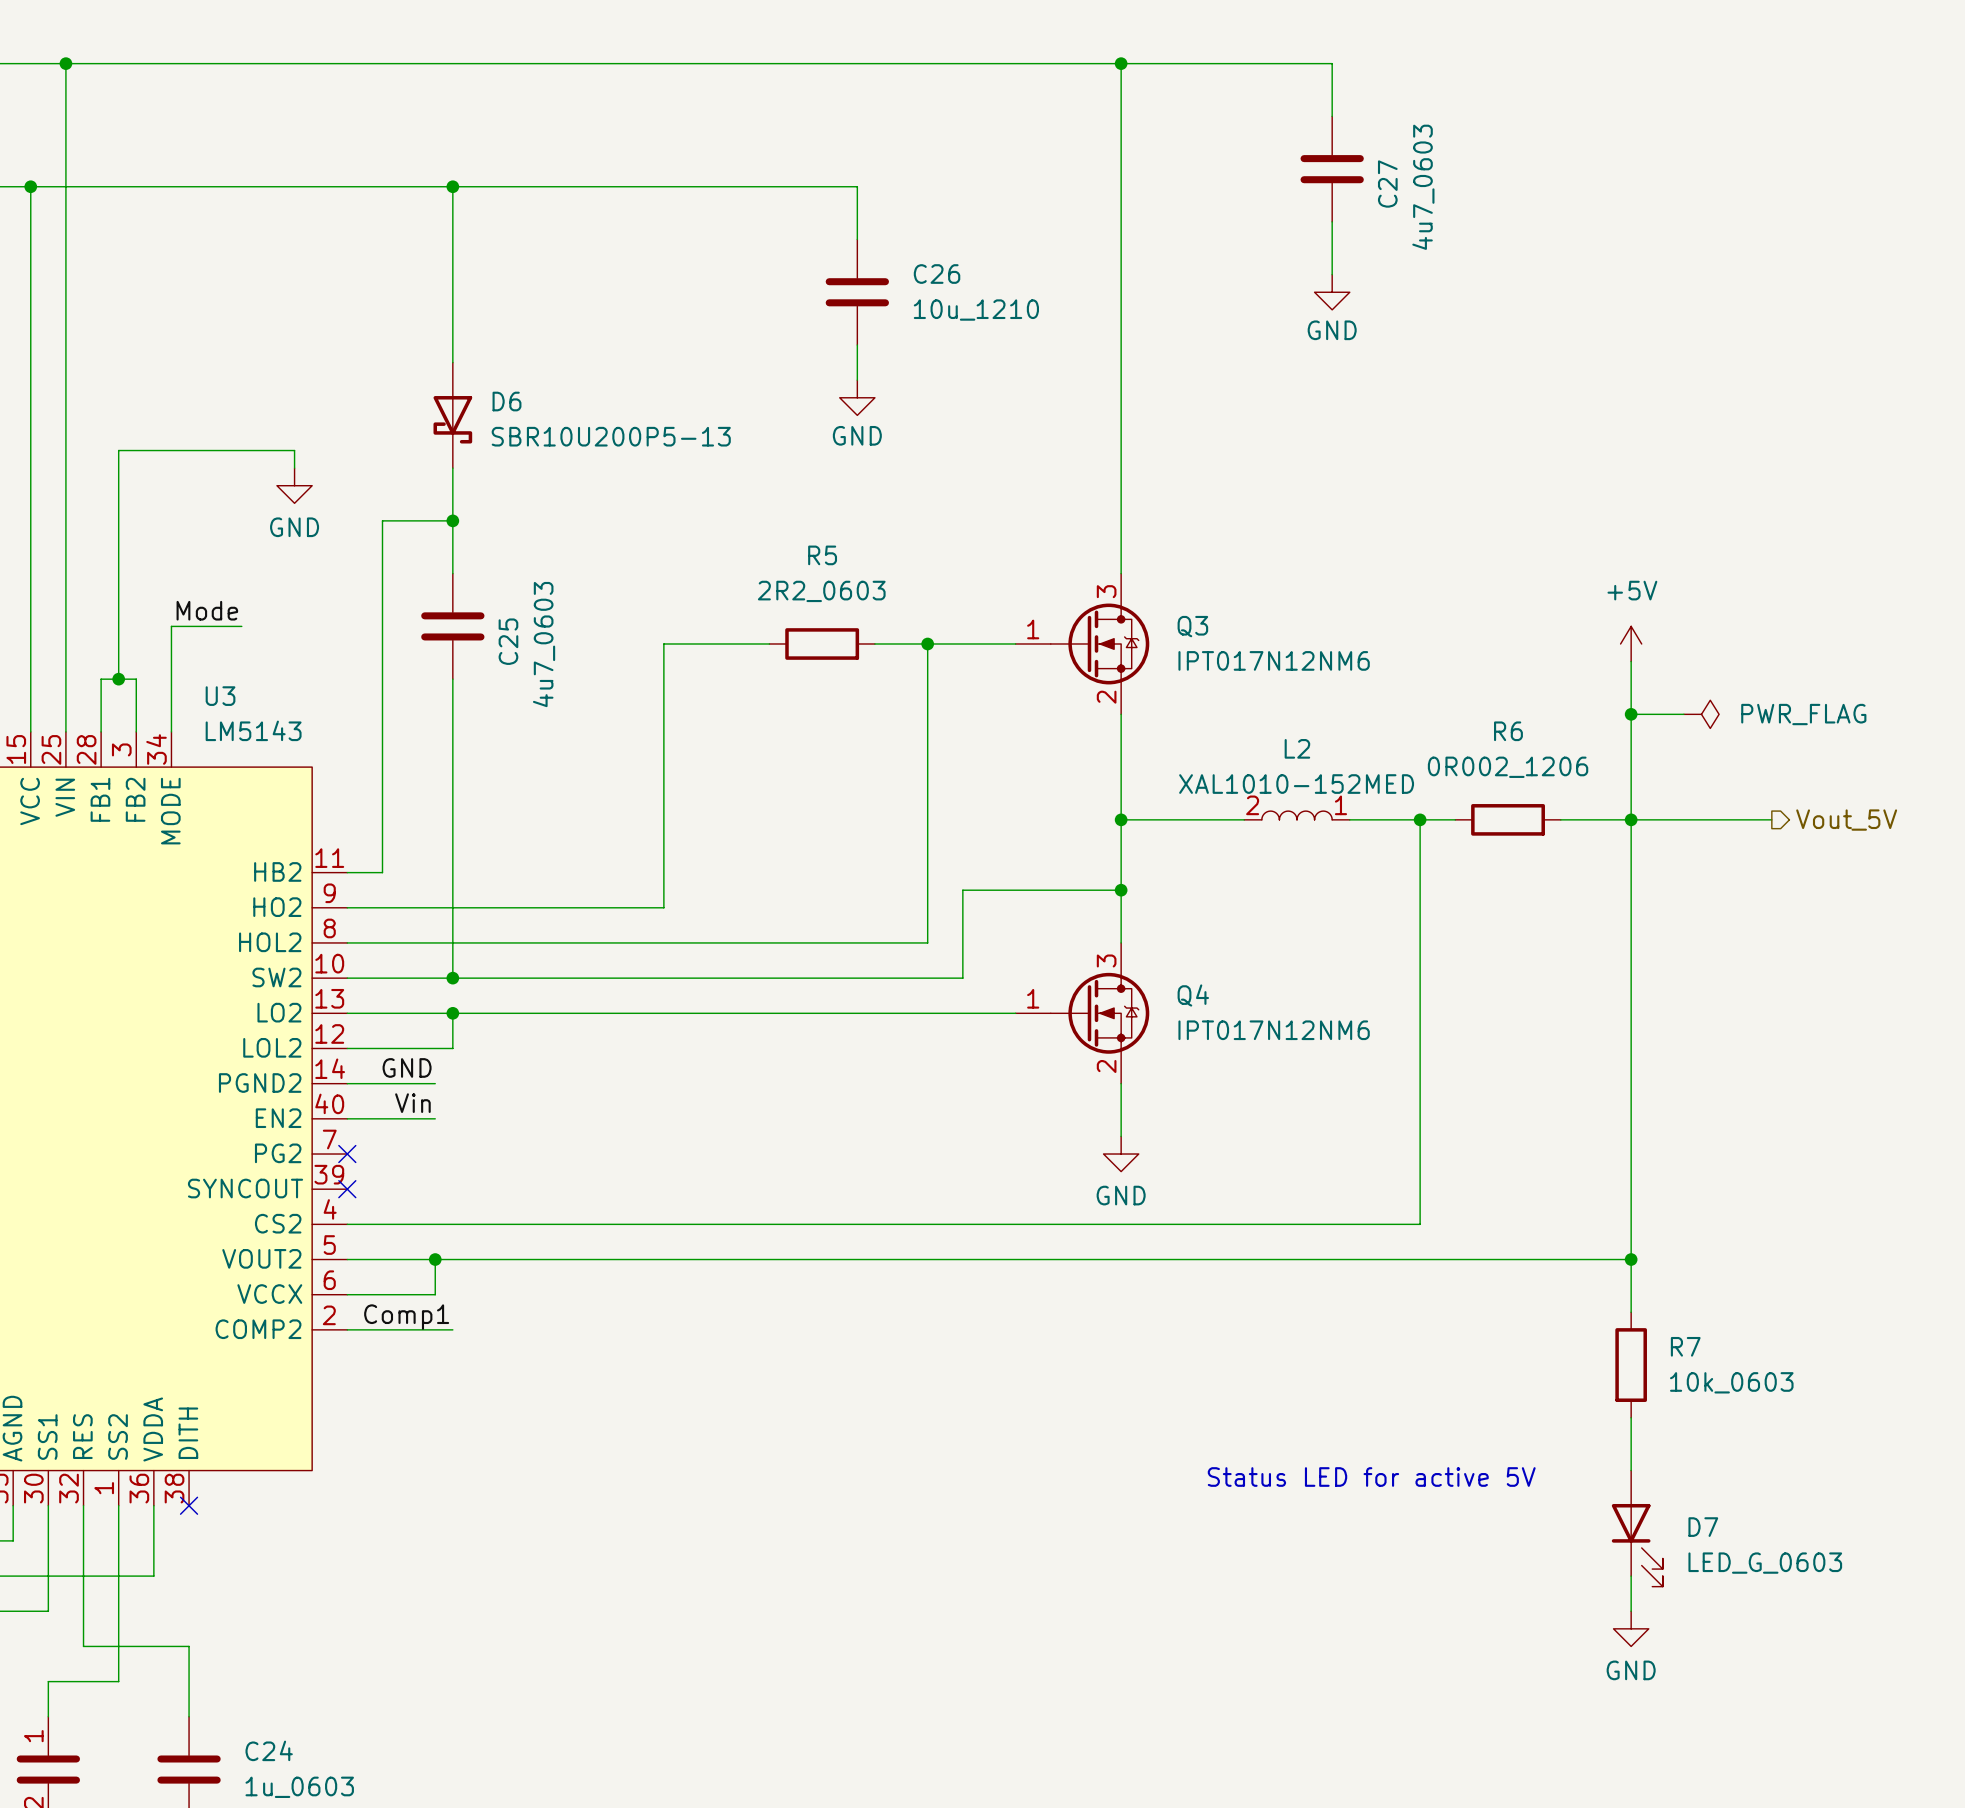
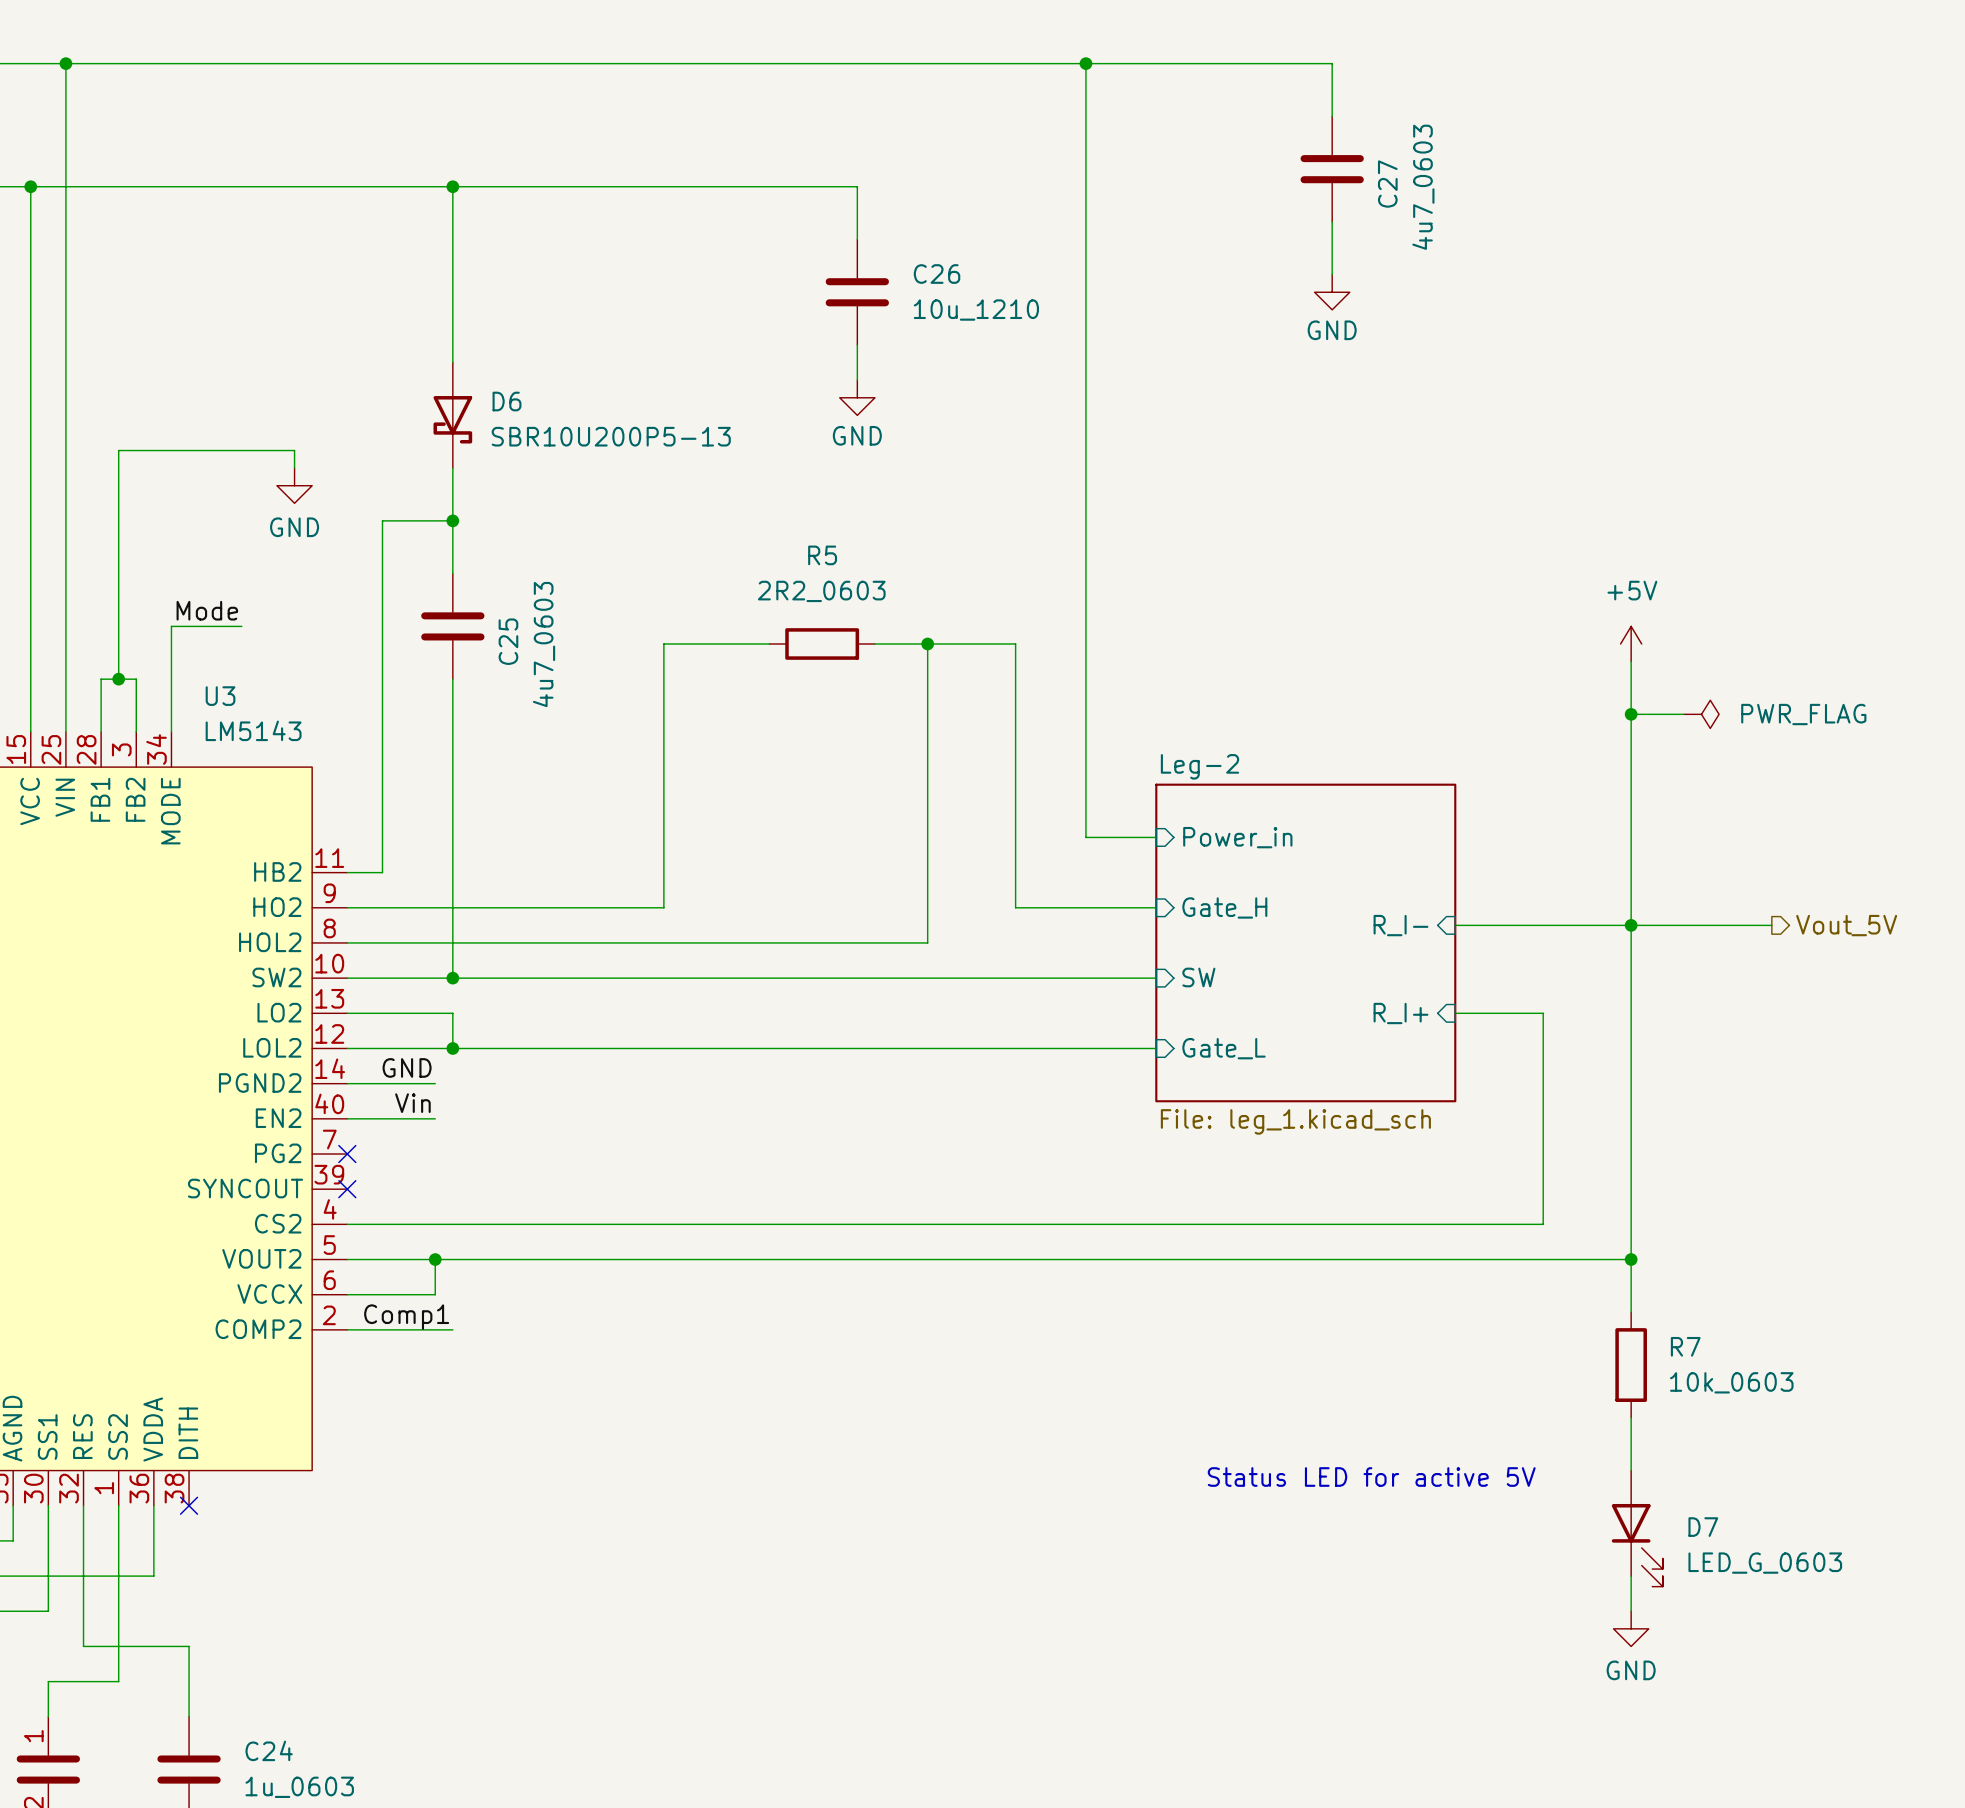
wire: none -> (1085, 63) (1085, 837) (1156, 837)
wire: (1121, 63) (1121, 573) -> none
junction position: (1121, 63) -> (1085, 63)
wire: none -> (1015, 643) (1015, 907) (1156, 907)
Q3: IPT017N12NM6 (1082, 643) -> none
wire: (1121, 714) (1121, 942) -> none
L2: XAL1010-152MED (1297, 815) -> none
wire: (1121, 819) (1244, 819) -> none
junction: (1121, 819) -> none
wire: (1349, 819) (1455, 819) -> none
wire: (1420, 819) (1420, 1224) -> (1455, 1013) (1543, 1013) (1543, 1224) (1420, 1224)
junction: (1420, 819) -> none
R6: 0R002_1206 (1508, 819) -> none
wire: (1560, 819) (1771, 819) -> none
junction: (1631, 819) -> none
hierarchical label position: Vout_5V (1846, 820) -> Vout_5V (1846, 925)
sheet pin: none -> Power_in (1237, 837)
wire: (1121, 890) (962, 890) (962, 978) -> (1156, 978) (962, 978)
junction: (1121, 890) -> none
sheet pin: none -> Gate_H (1224, 907)
sheet pin: none -> R_I- (1400, 925)
wire: none -> (1455, 925) (1771, 925)
junction: none -> (1631, 925)
sheet Leg-2: none -> File: leg_1.kicad_sch (1305, 942)
sheet pin: none -> SW (1198, 977)
wire: (452, 1013) (1015, 1013) -> none
junction position: (452, 1013) -> (452, 1048)
Q4: IPT017N12NM6 (1082, 1013) -> none
sheet pin: none -> R_I+ (1400, 1013)
wire: none -> (452, 1048) (1156, 1048)
sheet pin: none -> Gate_L (1224, 1048)
wire: (1121, 1083) (1121, 1136) -> none
power symbol: GND (1121, 1154) -> none

